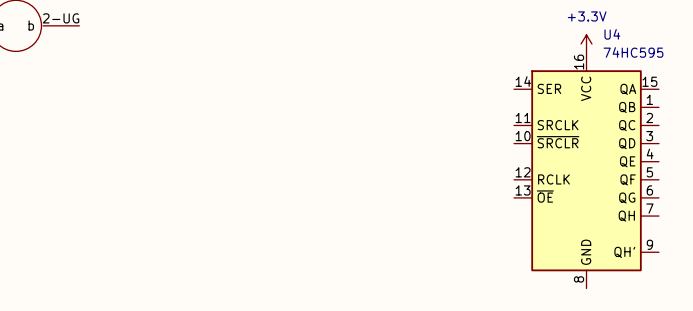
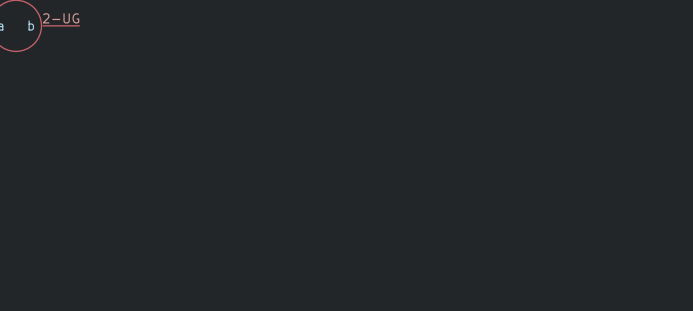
power symbol: +3.3V (586, 43) -> none
U4: 74HC595 (586, 170) -> none

